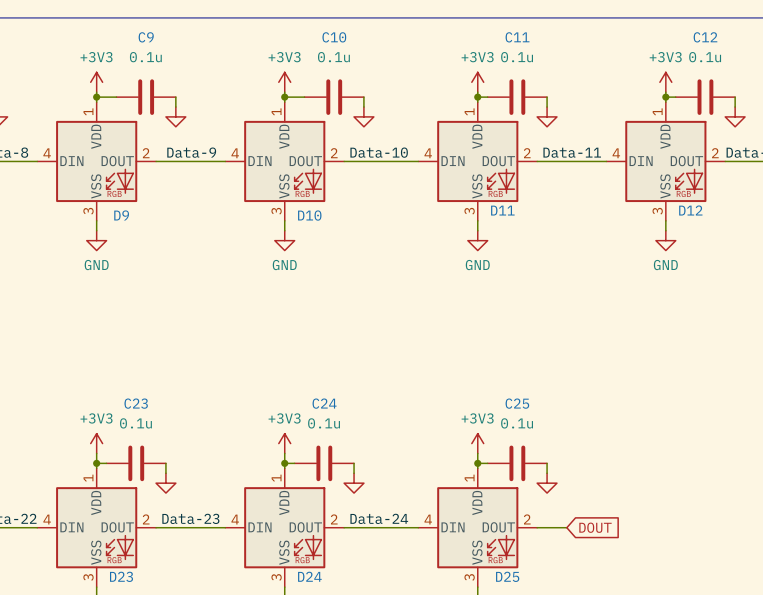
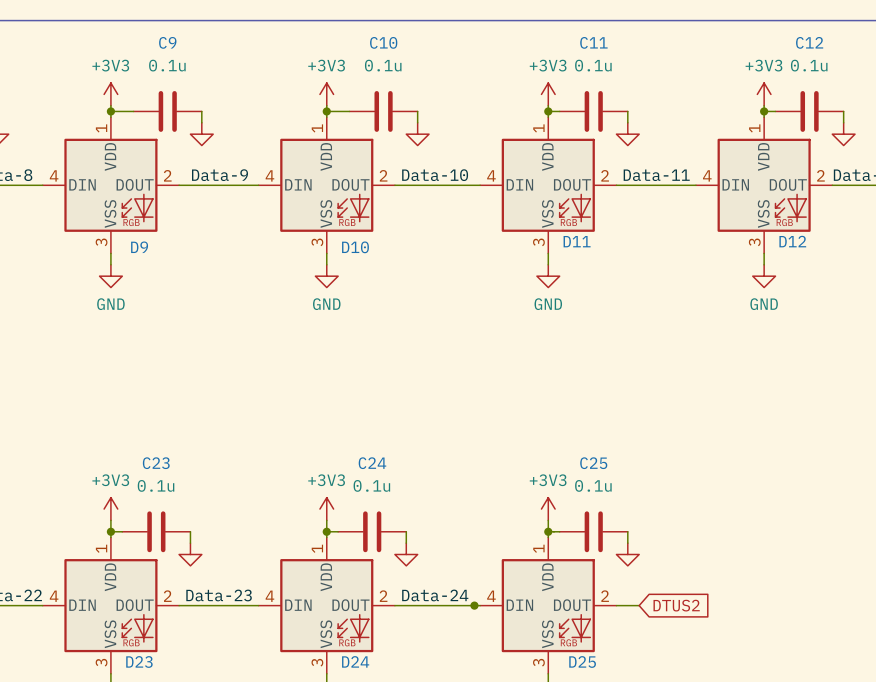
junction: none -> (474, 605)
wire: (556, 527) (566, 527) -> none
global label: none -> DTUS2 (676, 605)
global label: DOUT (595, 527) -> none

